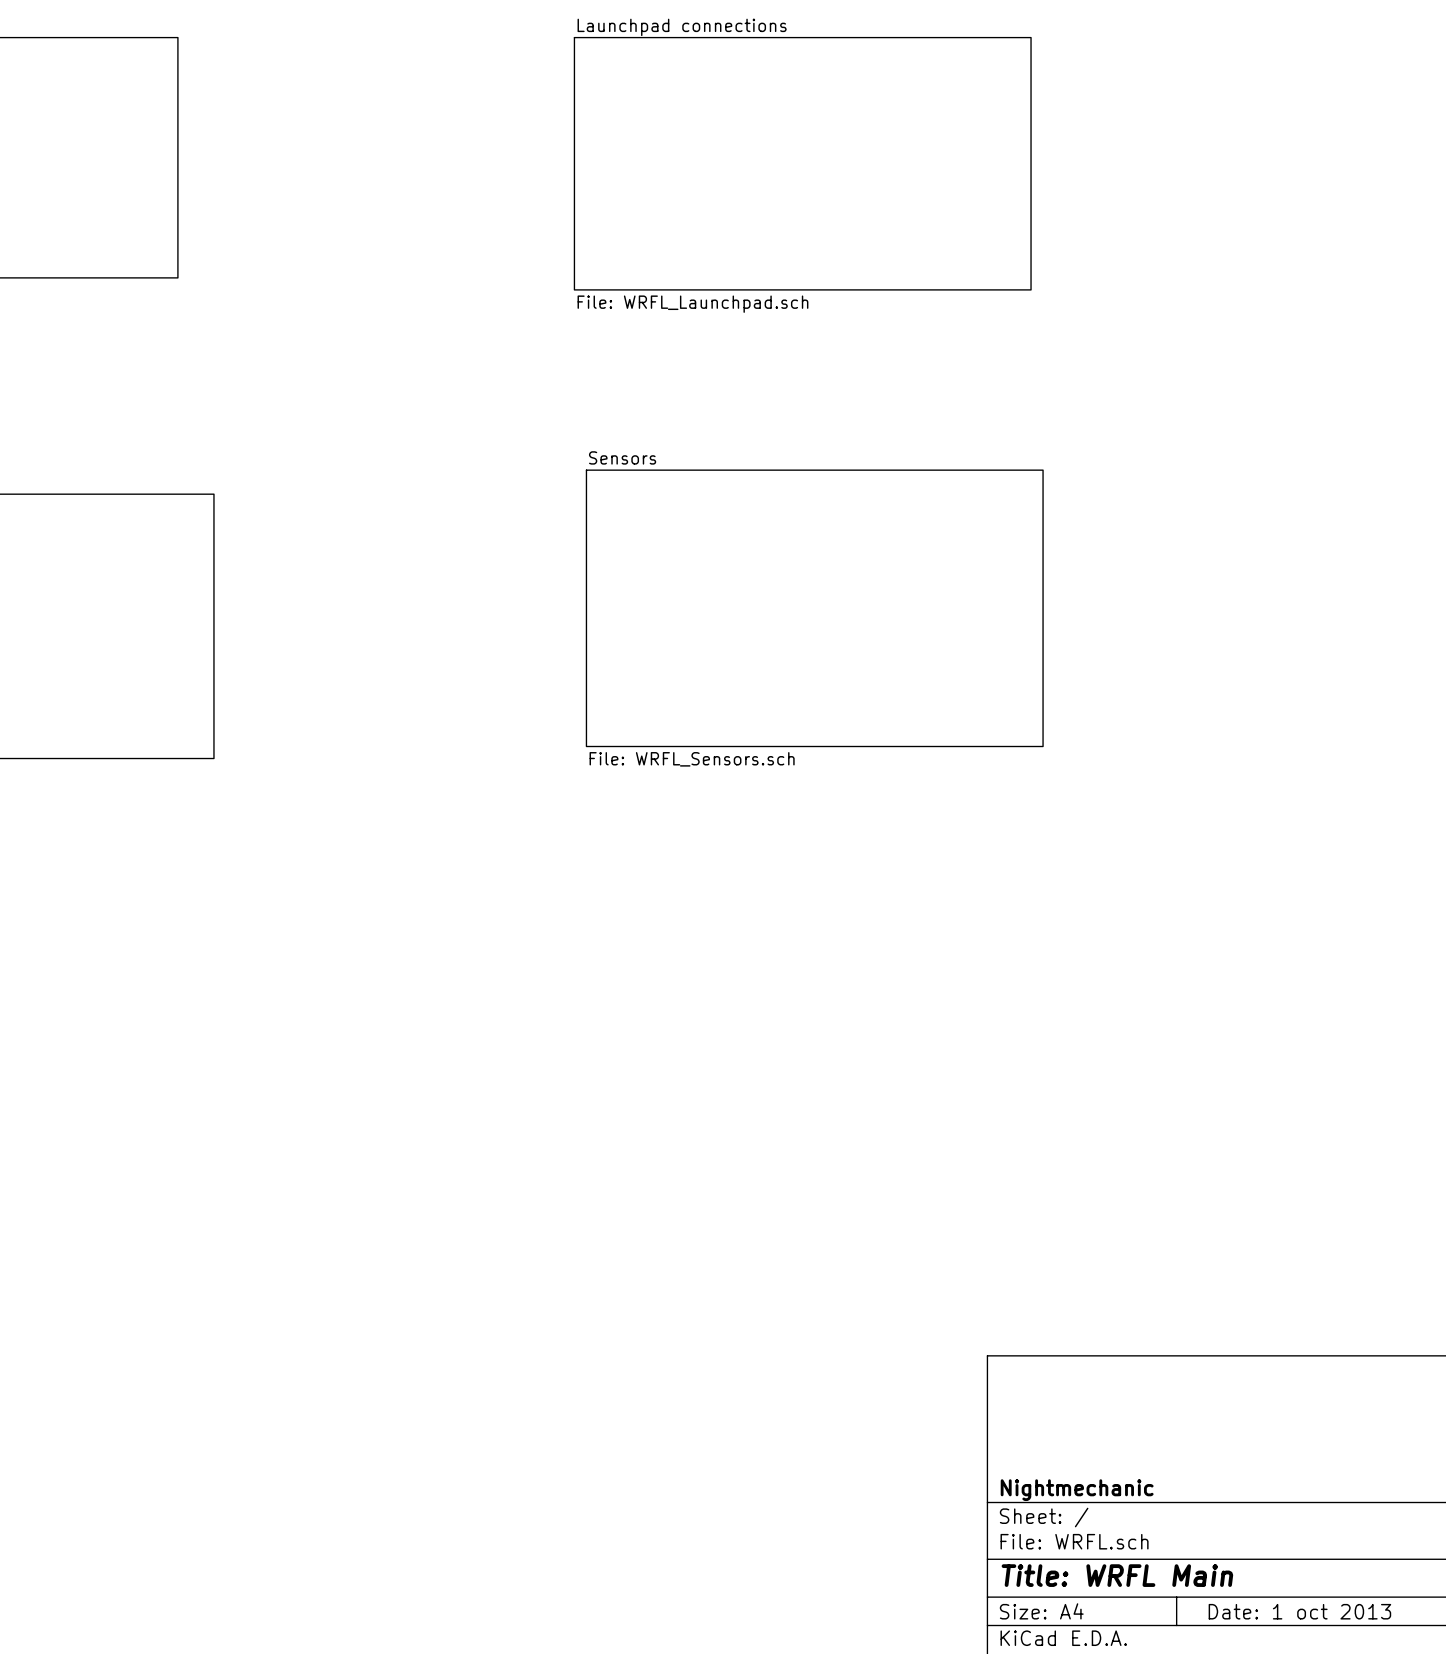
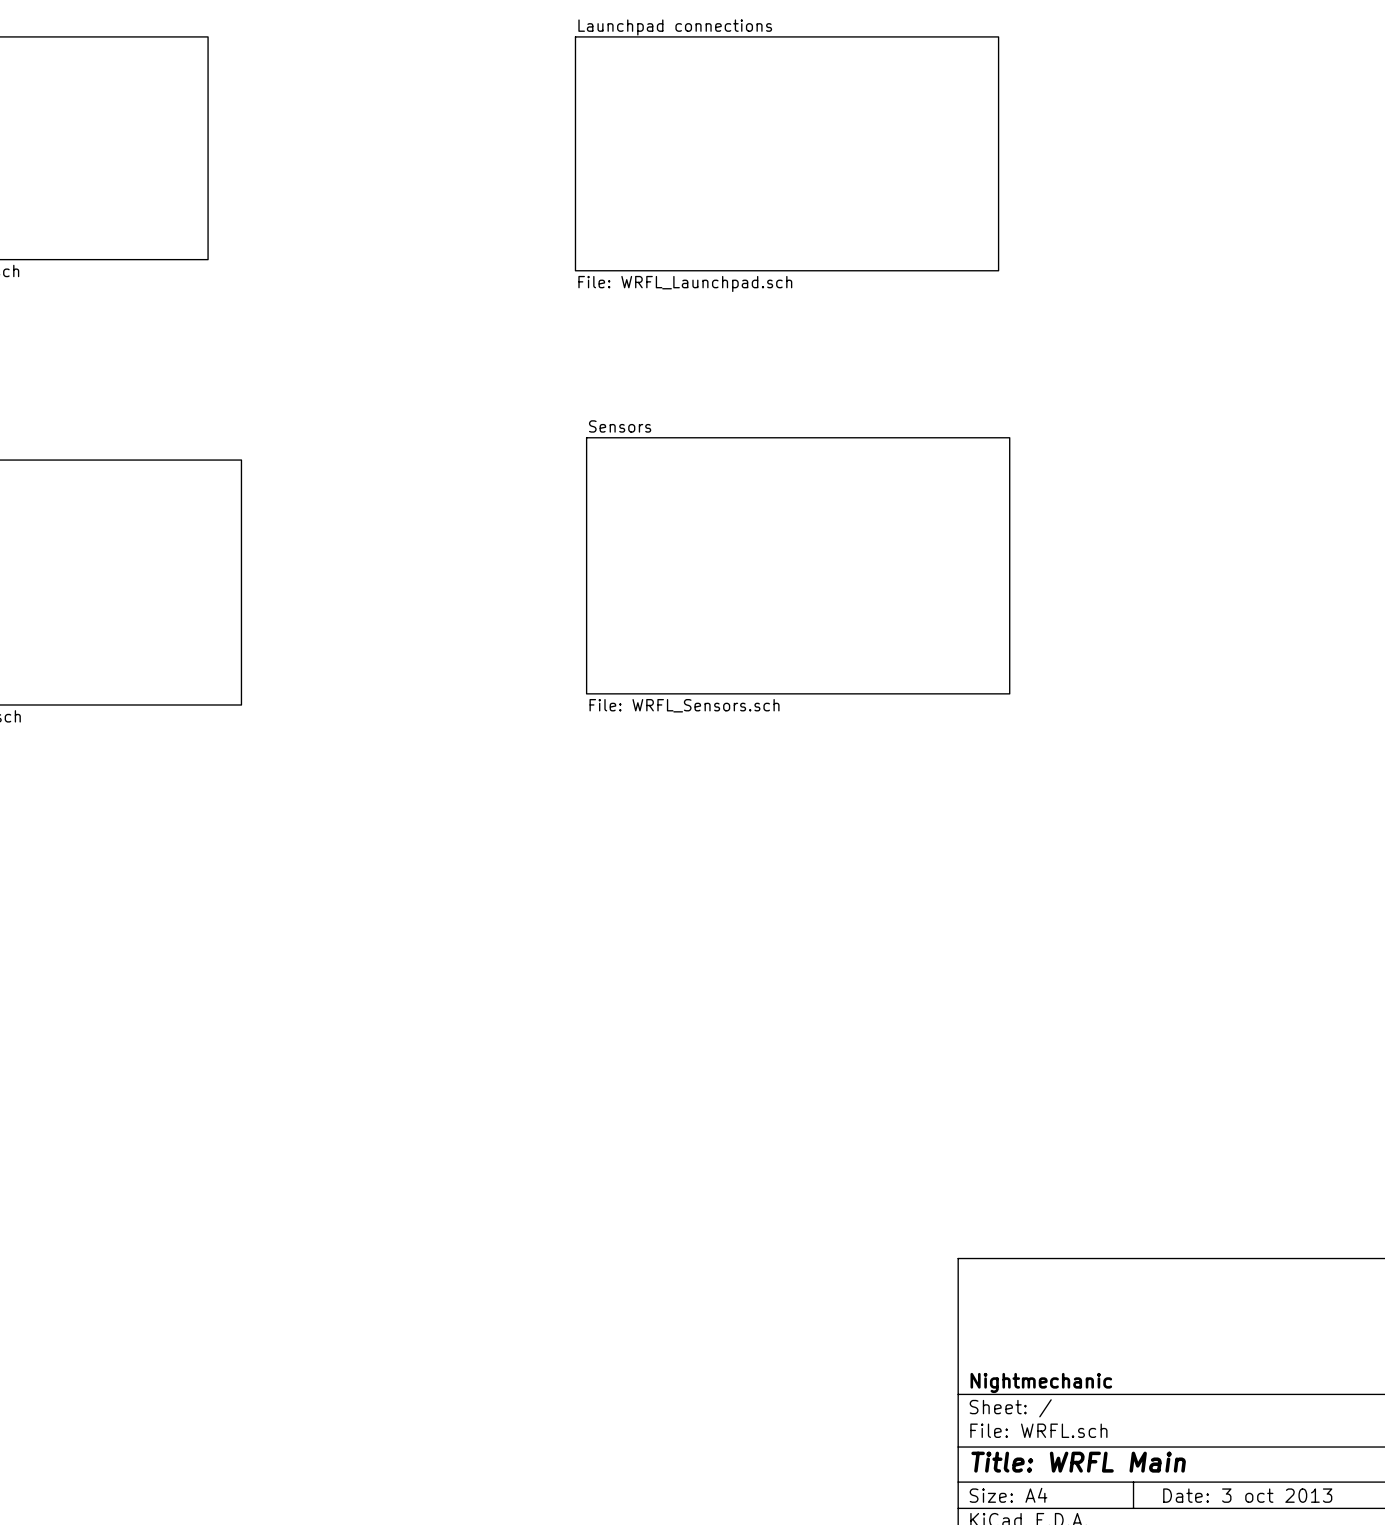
title block: Date: 1 oct 2013 (1299, 1611) -> Date: 3 oct 2013 (1247, 1495)

